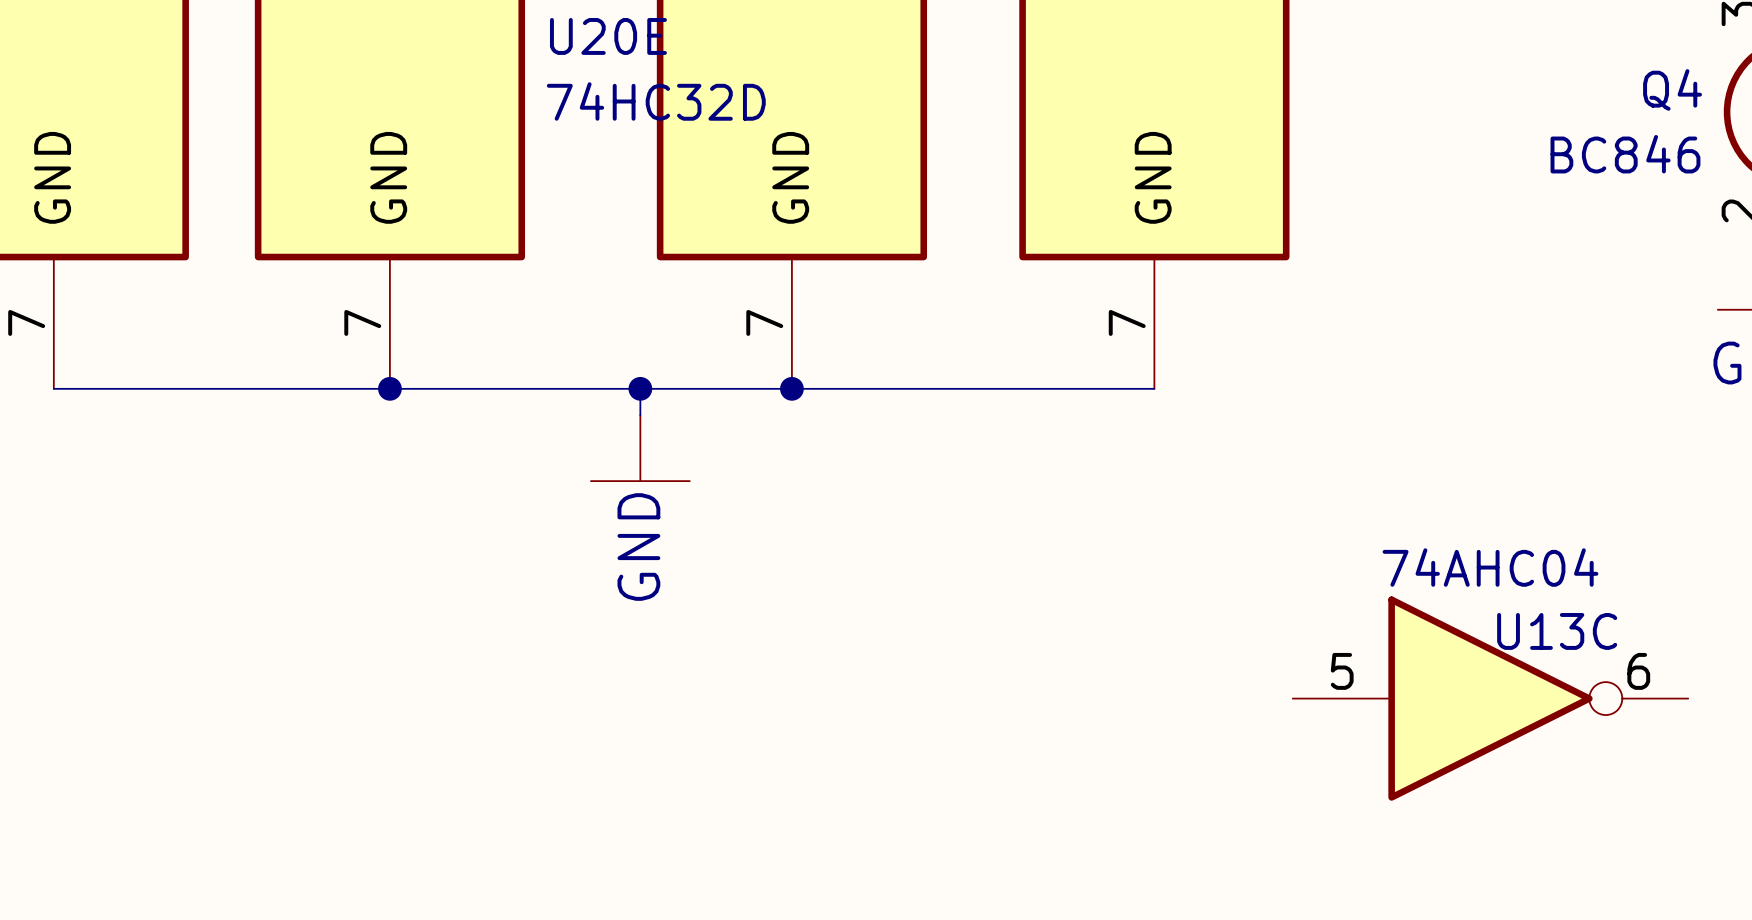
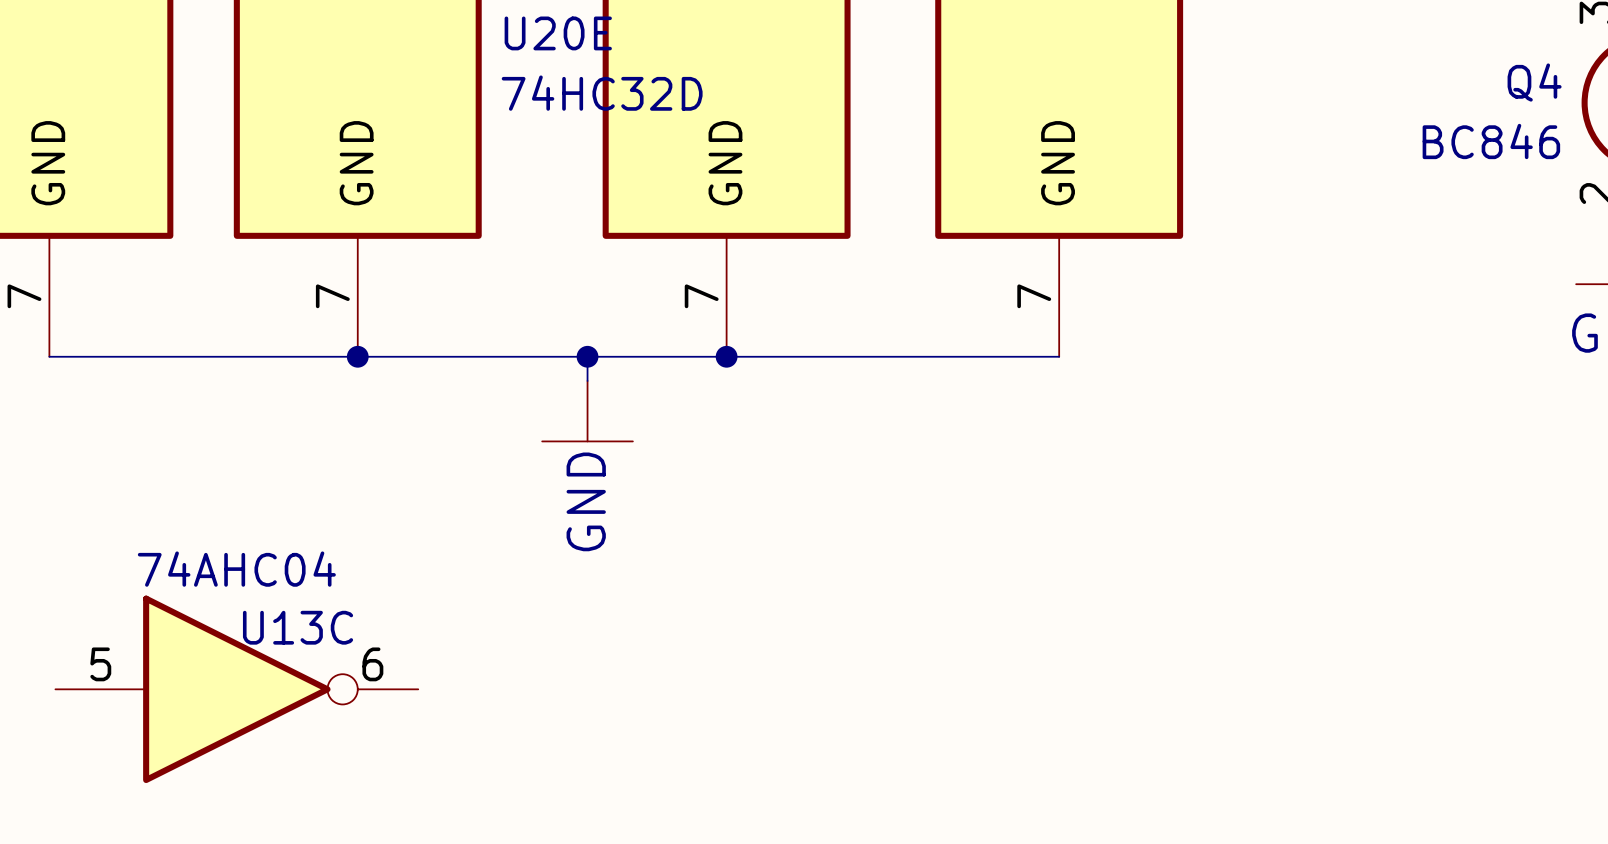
U13C position: (1490, 698) -> (236, 689)

